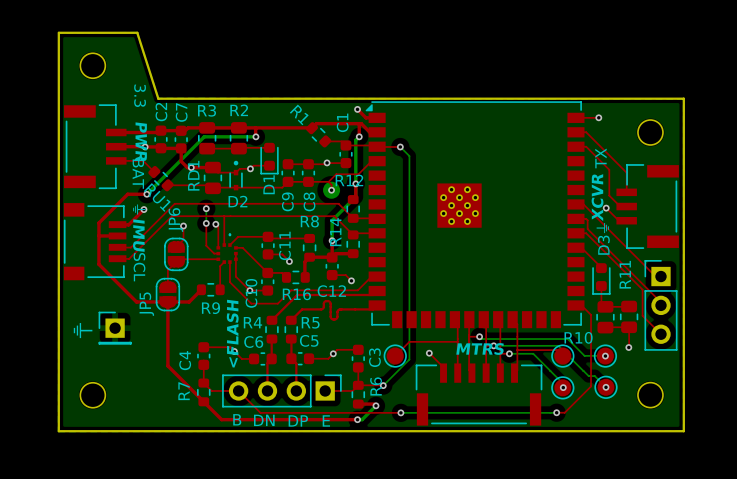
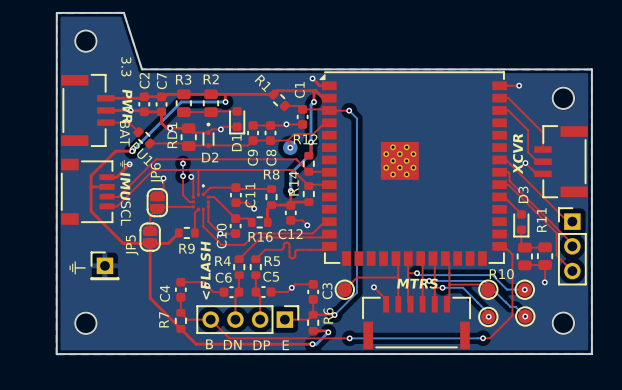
text: TX (600, 158) -> none
text: ⏚ (602, 228) -> none

